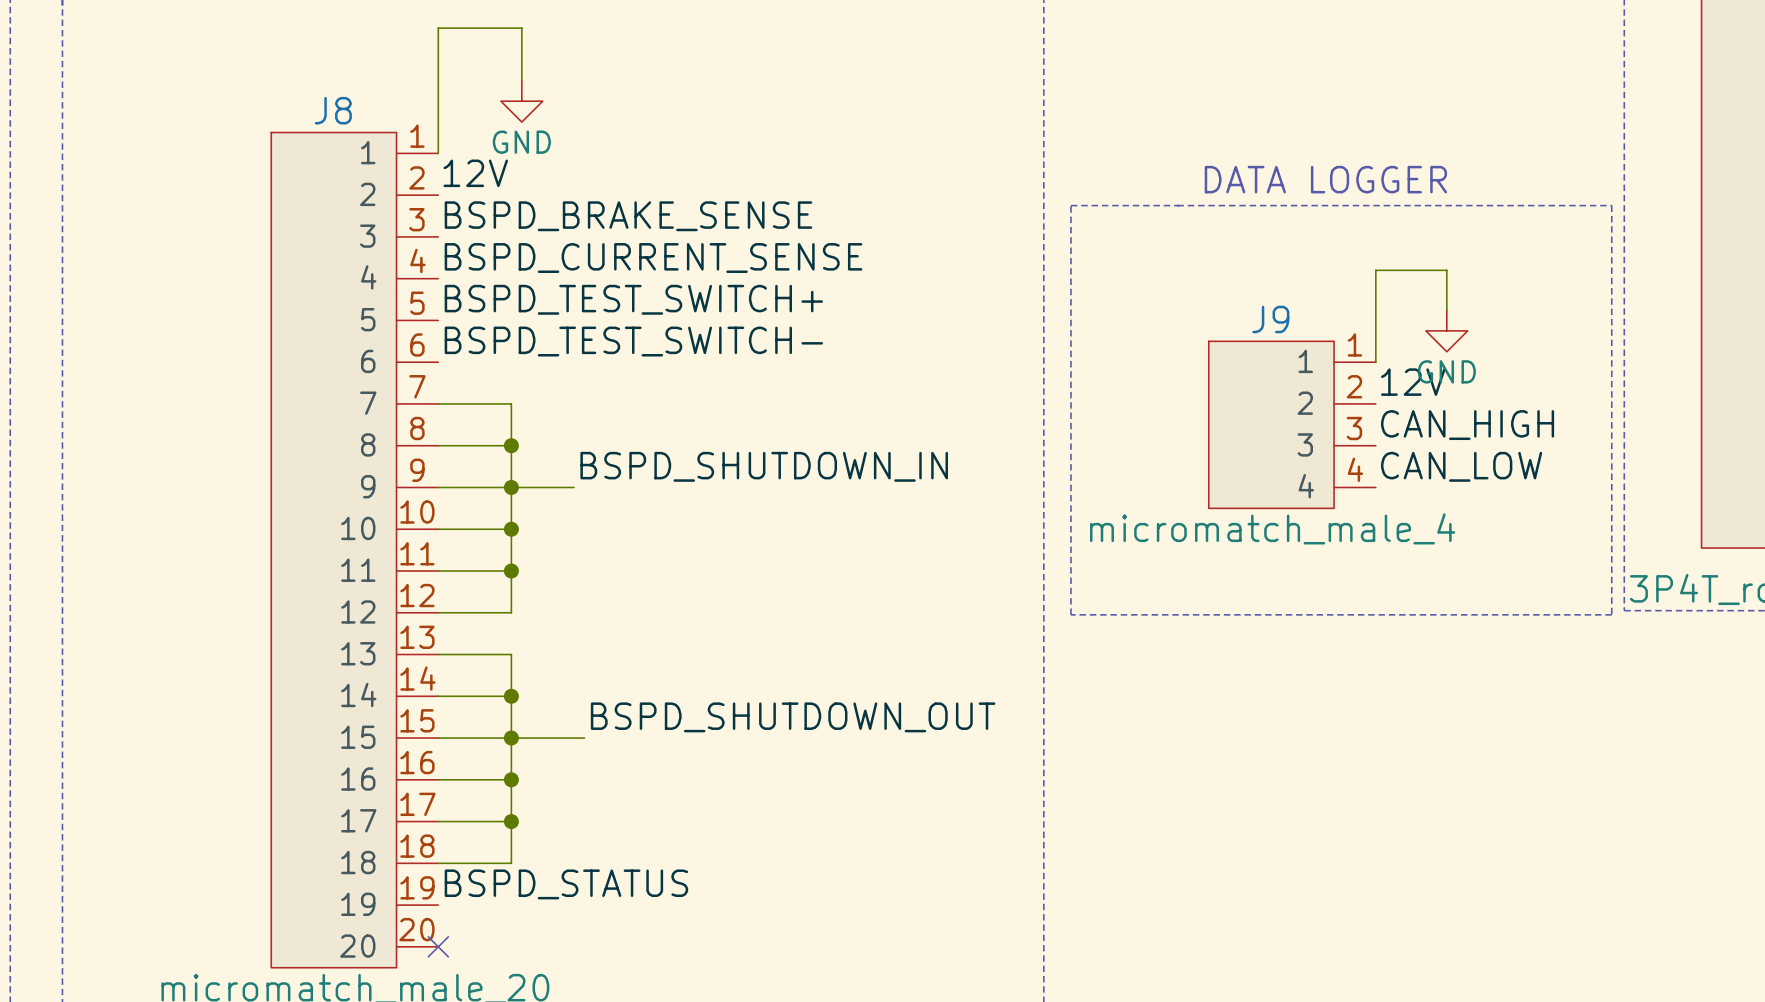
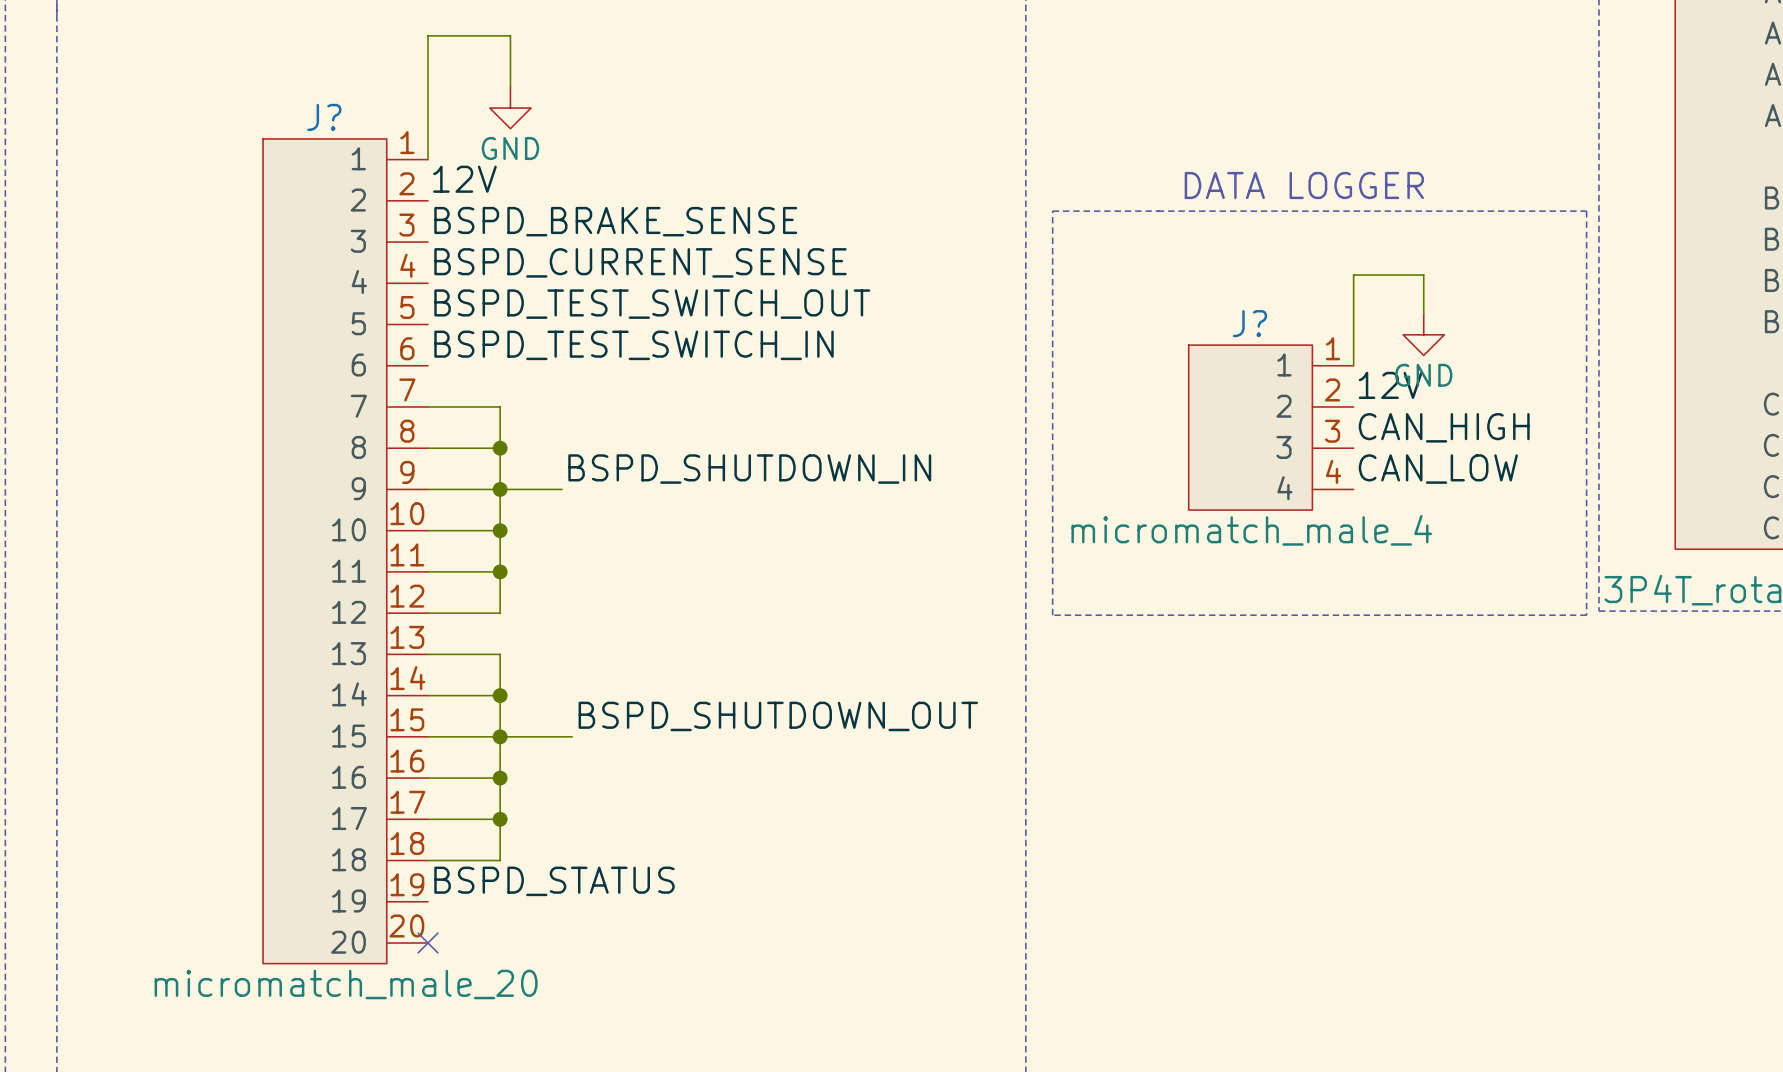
J8 name: J8 (333, 110) -> J? (324, 117)
label: BSPD_TEST_SWITCH+ (633, 299) -> BSPD_TEST_SWITCH_OUT (652, 304)
J9 name: J9 (1270, 319) -> J? (1249, 323)
label: BSPD_TEST_SWITCH- (633, 341) -> BSPD_TEST_SWITCH_IN (634, 345)

